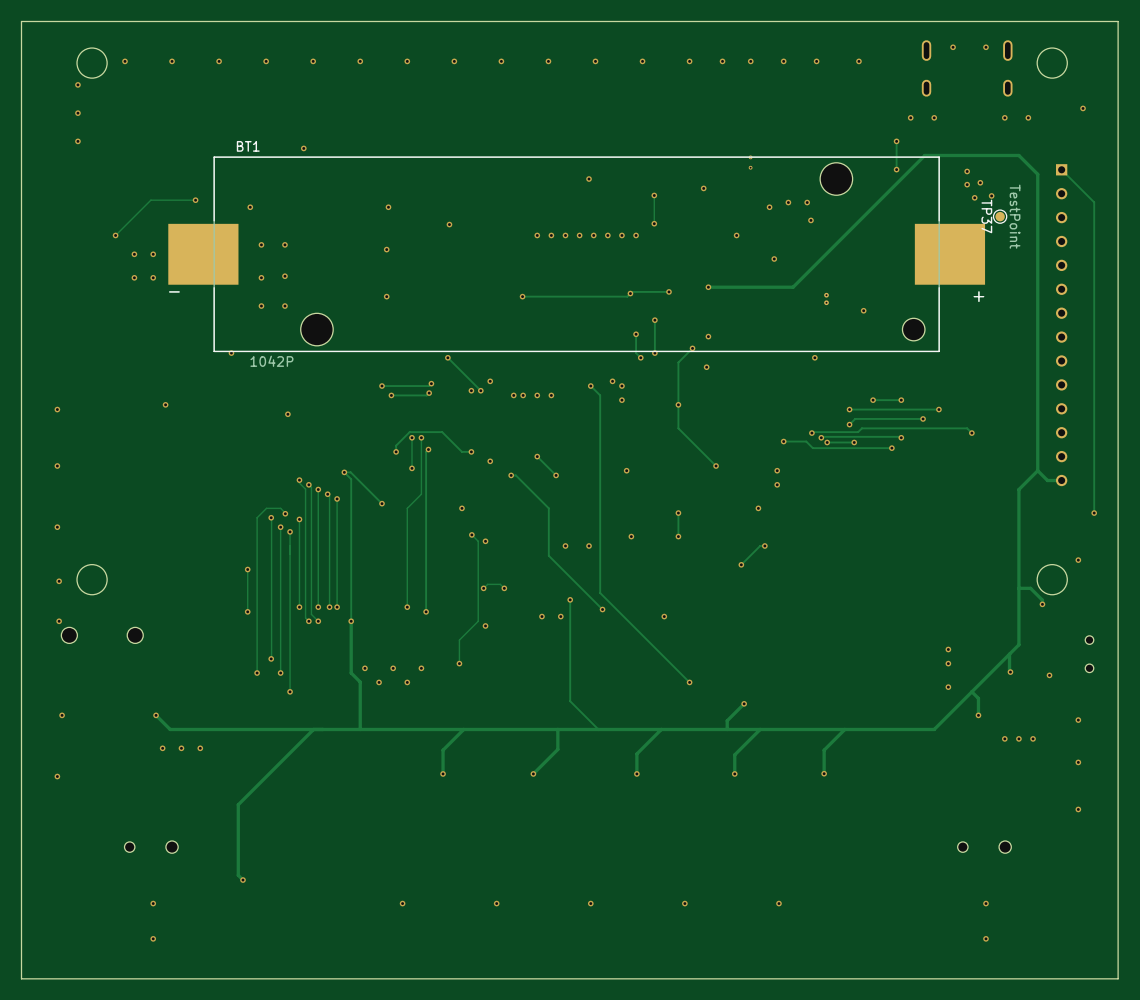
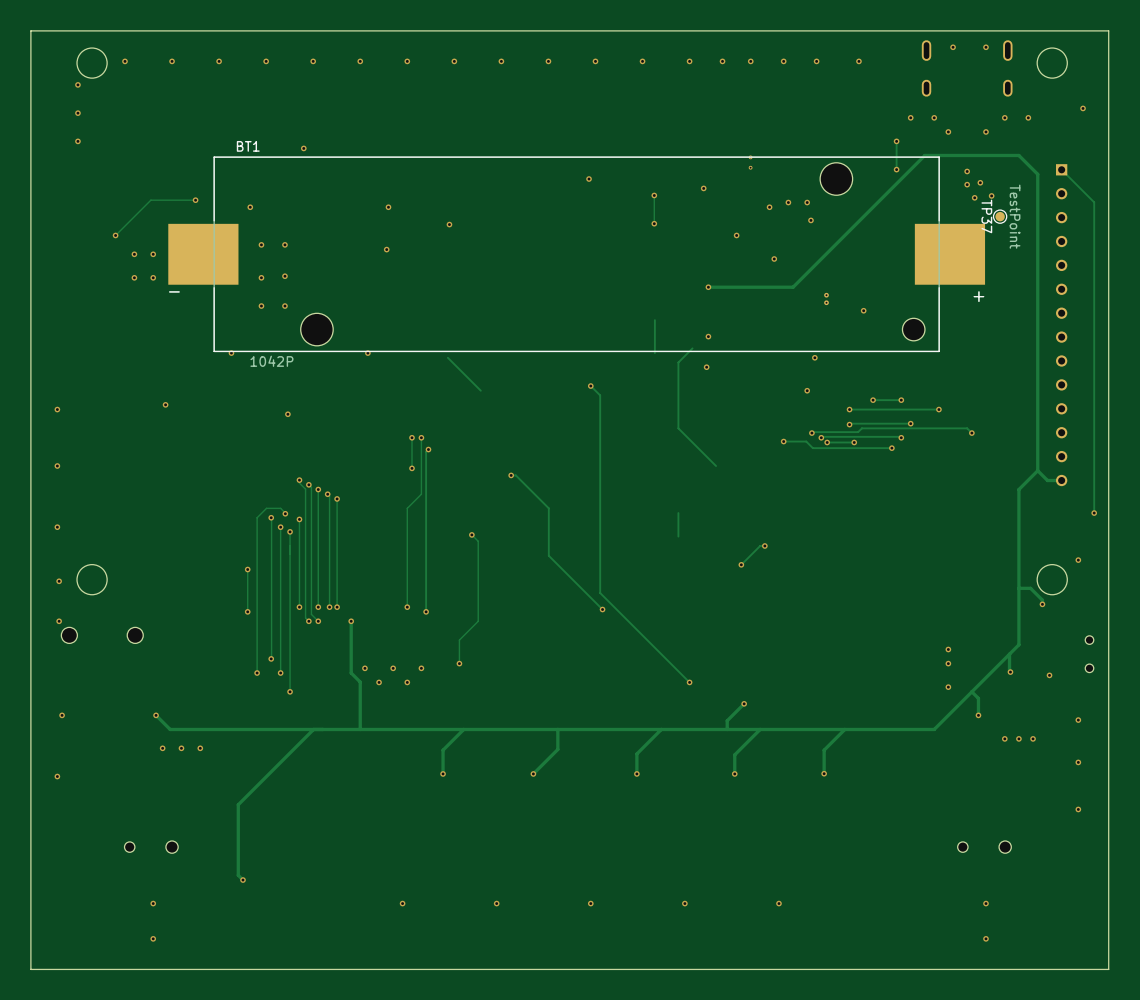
board edge: (1118, 21) (21, 21) (21, 978) (1118, 978) (1118, 21) -> (1108, 30) (1108, 969) (30, 969) (30, 30) (1108, 30)
via: none -> (948, 131)
via: none -> (985, 131)
via: (537, 235) -> none
via: (551, 235) -> none
via: (565, 235) -> none
via: (579, 235) -> none
via: (593, 235) -> none
via: (607, 235) -> none
via: (621, 235) -> none
via: (636, 235) -> none
track: (669, 291) (632, 291) (627, 296) (522, 296) -> none
via: (669, 291) -> none
via: (630, 293) -> none
via: (386, 296) -> none
via: (522, 296) -> none
via: (654, 320) -> none
track: (636, 334) (636, 353) (640, 357) -> none
via: (636, 334) -> none
via: (692, 348) -> none
via: none -> (367, 353)
via: (654, 353) -> none
via: (447, 357) -> none
via: (640, 357) -> none
via: (490, 381) -> none
via: (612, 381) -> none
track: (431, 383) (429, 386) (382, 386) -> none
via: (431, 383) -> none
via: (382, 386) -> none
via: (621, 386) -> none
via: (471, 390) -> none
via: (480, 390) -> none
via: none -> (807, 390)
track: (429, 393) (426, 395) (391, 395) -> none
via: (429, 393) -> none
via: (391, 395) -> none
via: (513, 395) -> none
via: (523, 395) -> none
via: (537, 395) -> none
via: (551, 395) -> none
via: (621, 400) -> none
via: (678, 404) -> none
track: (923, 418) (855, 418) (850, 423) -> (910, 423) (850, 423)
via position: (923, 418) -> (910, 423)
via: (396, 451) -> none
track: (471, 451) (461, 451) (442, 432) (409, 432) (396, 445) (396, 451) -> none
via: (471, 451) -> none
track: (537, 456) (556, 475) -> none
via: (537, 456) -> none
via: (490, 461) -> none
via: (716, 466) -> none
via: (626, 470) -> none
via: (777, 470) -> none
via: (344, 472) -> none
via: (556, 475) -> none
via: (777, 484) -> none
track: (382, 503) (350, 472) (344, 472) (351, 479) (351, 621) -> none
via: (382, 503) -> none
via: (461, 508) -> none
via: (758, 508) -> none
via: (678, 513) -> none
via: (631, 536) -> none
via: (678, 536) -> none
via: (485, 541) -> none
via: (565, 545) -> none
via: (589, 545) -> none
via: (483, 588) -> none
track: (504, 588) (500, 584) (487, 584) (483, 588) -> none
via: (504, 588) -> none
track: (570, 599) (570, 701) (598, 729) -> none
via: (570, 599) -> none
via: (541, 616) -> none
via: (560, 616) -> none
via: (664, 616) -> none
via: (485, 625) -> none

